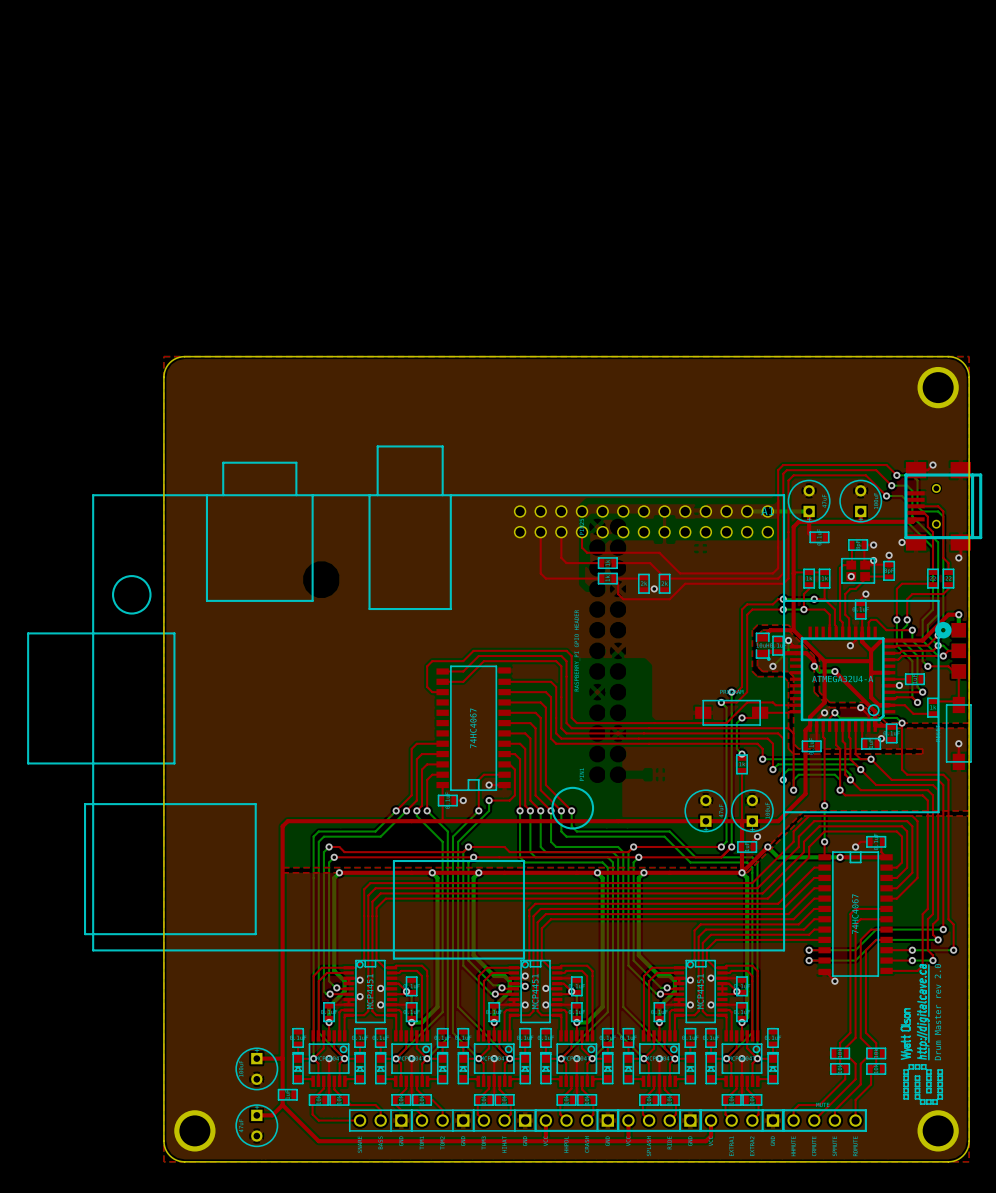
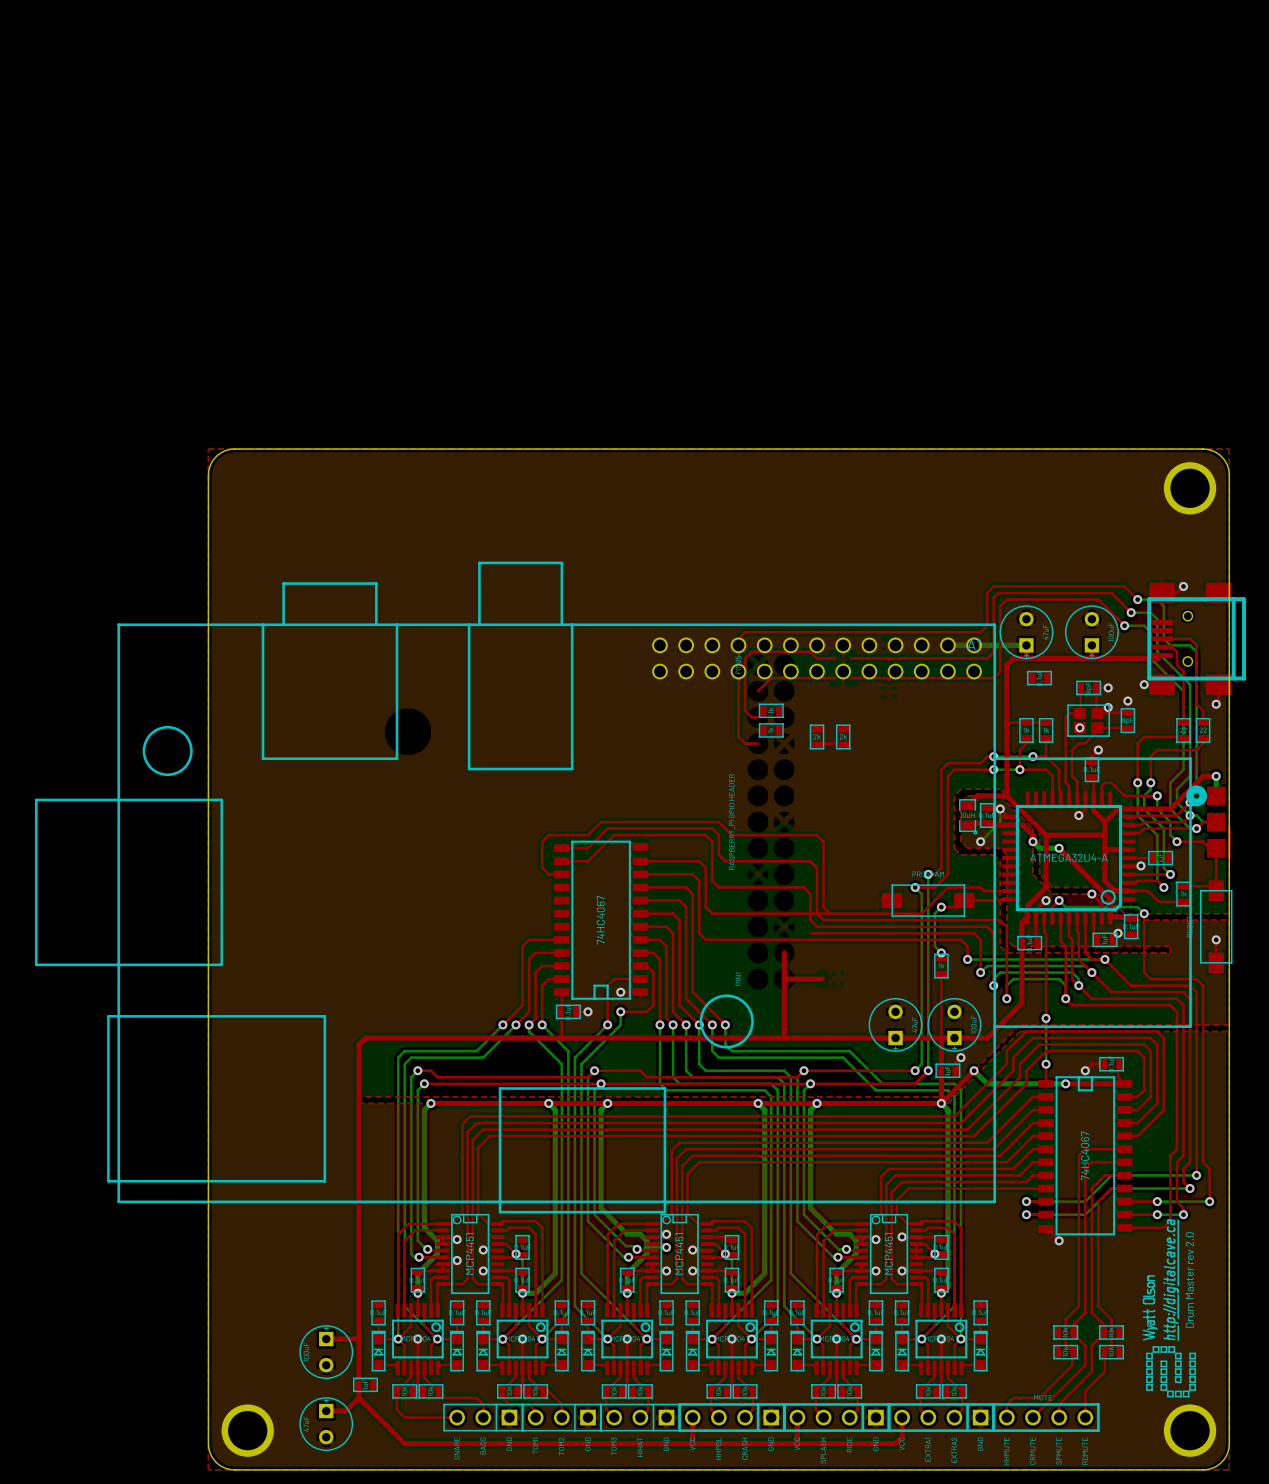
top track: (778, 496) (778, 568) (772, 573) (680, 573) (659, 552) (587, 552) (582, 547) -> (987, 625) (980, 632) (745, 632) (738, 638) (738, 671)
top track: (783, 516) (783, 573) (778, 578) (665, 578) (650, 563) (614, 563) -> (993, 651) (987, 658) (851, 658)
top track: none -> (835, 658) (817, 658) (810, 651) (751, 651) (745, 658) (745, 710) (751, 717) (758, 717)
top track: (809, 521) (809, 533) (813, 537) -> none
top track: (540, 532) (540, 573) (545, 578) (601, 578) -> none
top track: (561, 532) (561, 557) (566, 563) (601, 563) -> none
top track: (788, 532) (788, 578) (783, 583) (685, 583) (669, 599) (623, 599) (618, 594) (618, 582) (614, 578) (643, 577) -> (1000, 671) (993, 678) (851, 678)
top track: none -> (835, 678) (771, 678) (758, 691)
top track: none -> (738, 691) (738, 736) (745, 743) (758, 743)
via: (654, 588) -> none
top track: (571, 656) (571, 717) (576, 723) -> (725, 828) (731, 835) (817, 835) (823, 841) (823, 907) (830, 913)
top track: (566, 676) (566, 723) (571, 728) (649, 728) -> (718, 854) (725, 861) (810, 861) (817, 867) (817, 913) (823, 920)
top track: (561, 697) (561, 728) (566, 733) (643, 733) -> (712, 880) (718, 887) (803, 887) (810, 894) (810, 920) (817, 926)
top track: (556, 717) (556, 733) (561, 738) (638, 738) -> (705, 907) (712, 913) (731, 913)
top track: none -> (784, 952) (784, 1038)
top track: none -> (784, 979) (822, 979)

